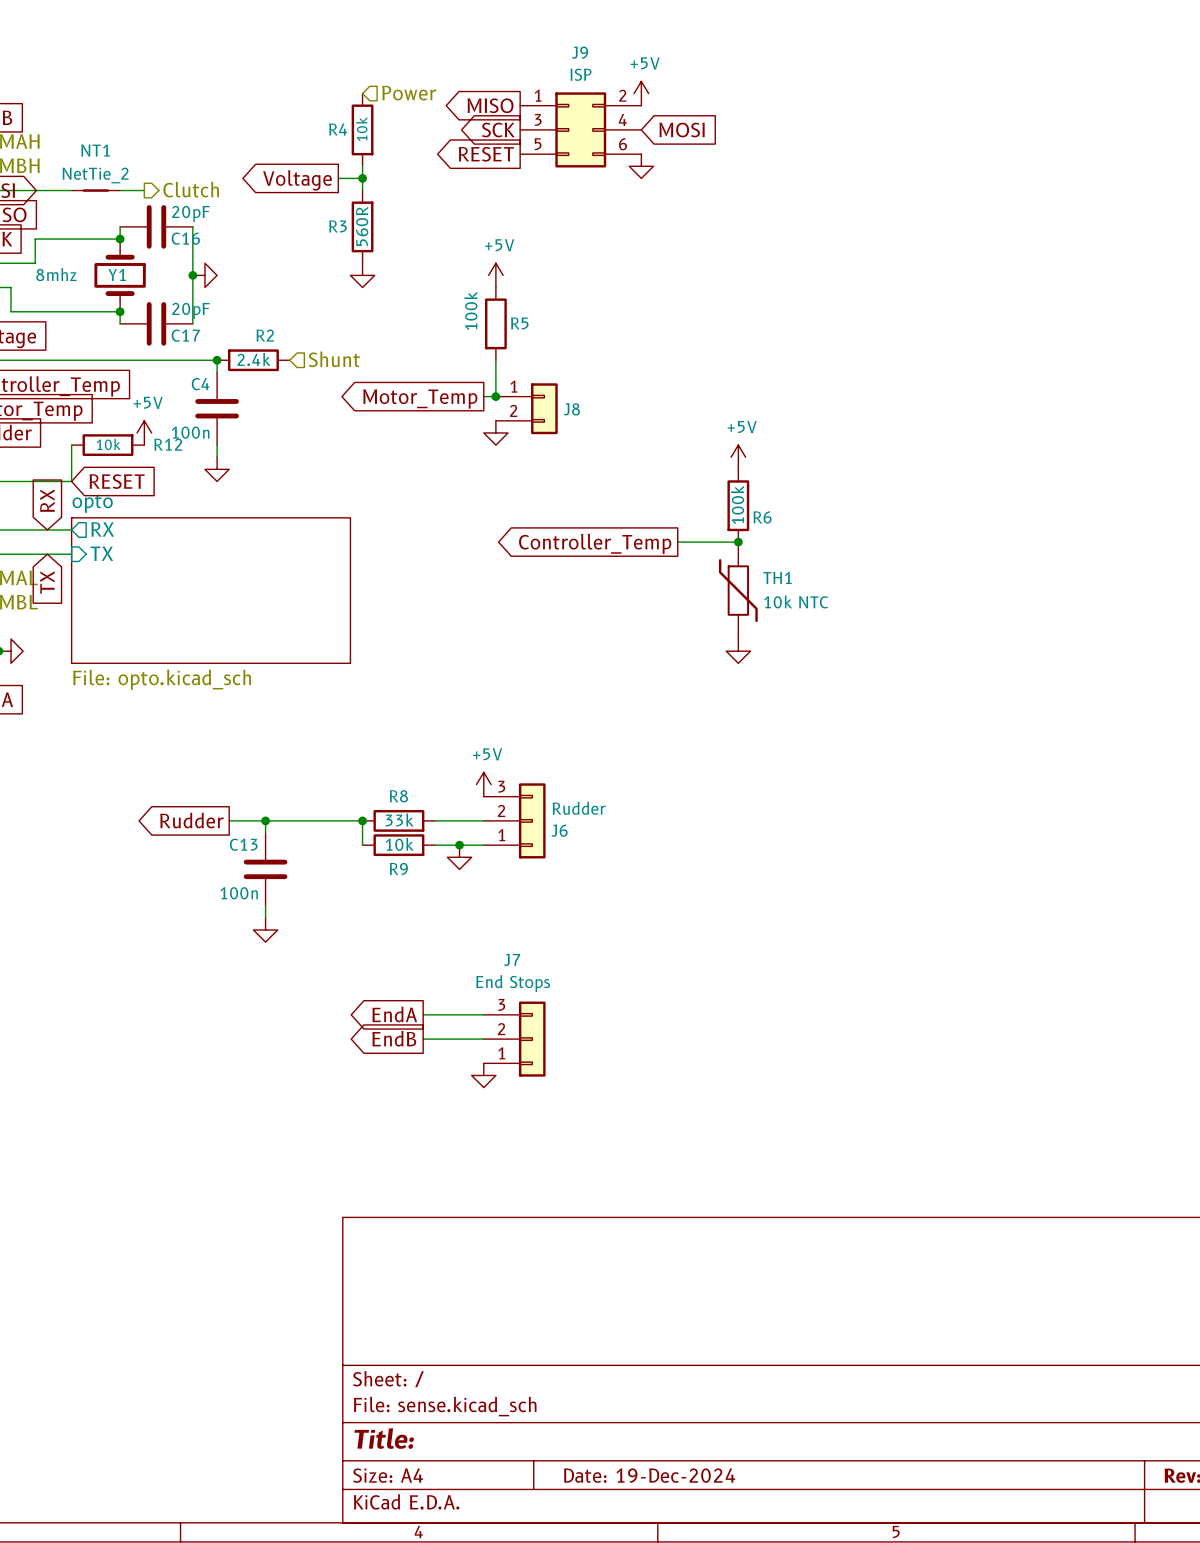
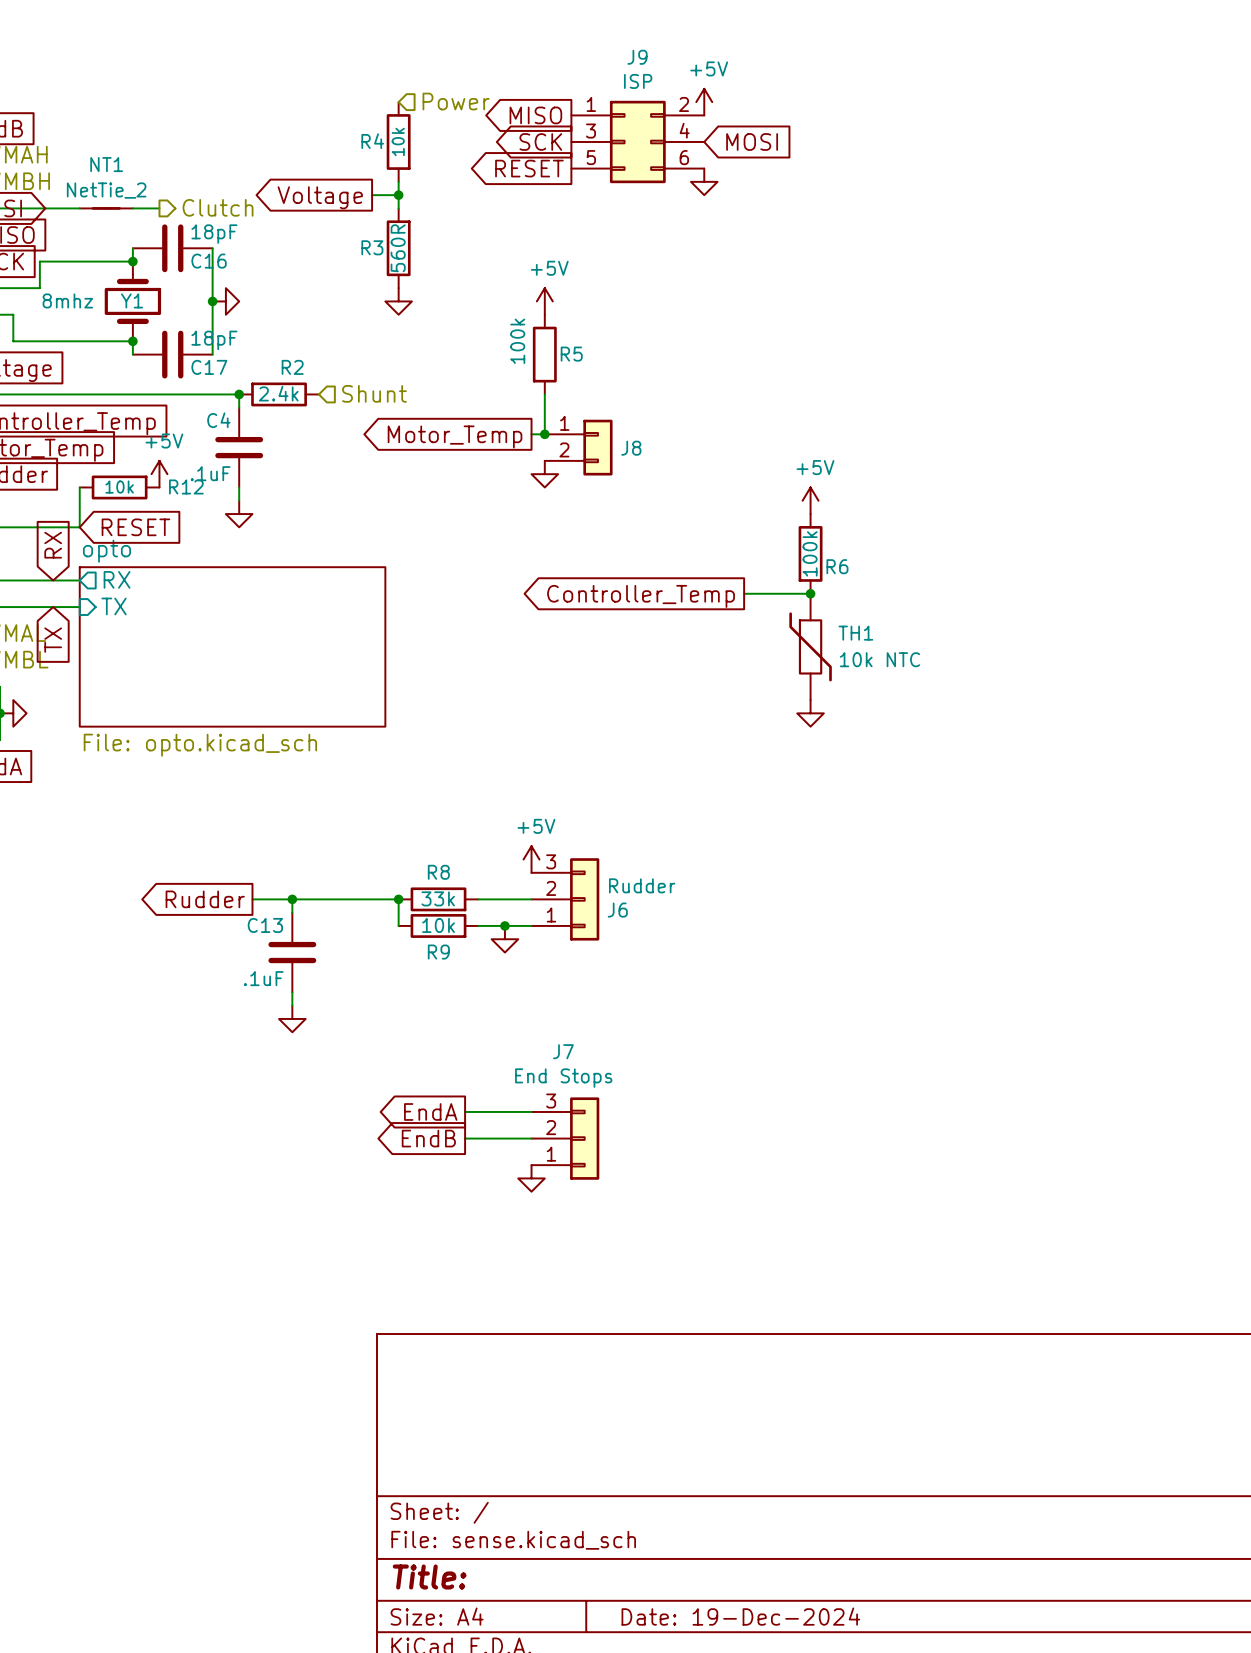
C16 value: 20pF (190, 213) -> 18pF (214, 234)
C17 value: 20pF (190, 310) -> 18pF (214, 340)
C4 value: 100n (190, 432) -> .1uF (210, 473)
C13 value: 100n (239, 893) -> .1uF (263, 978)

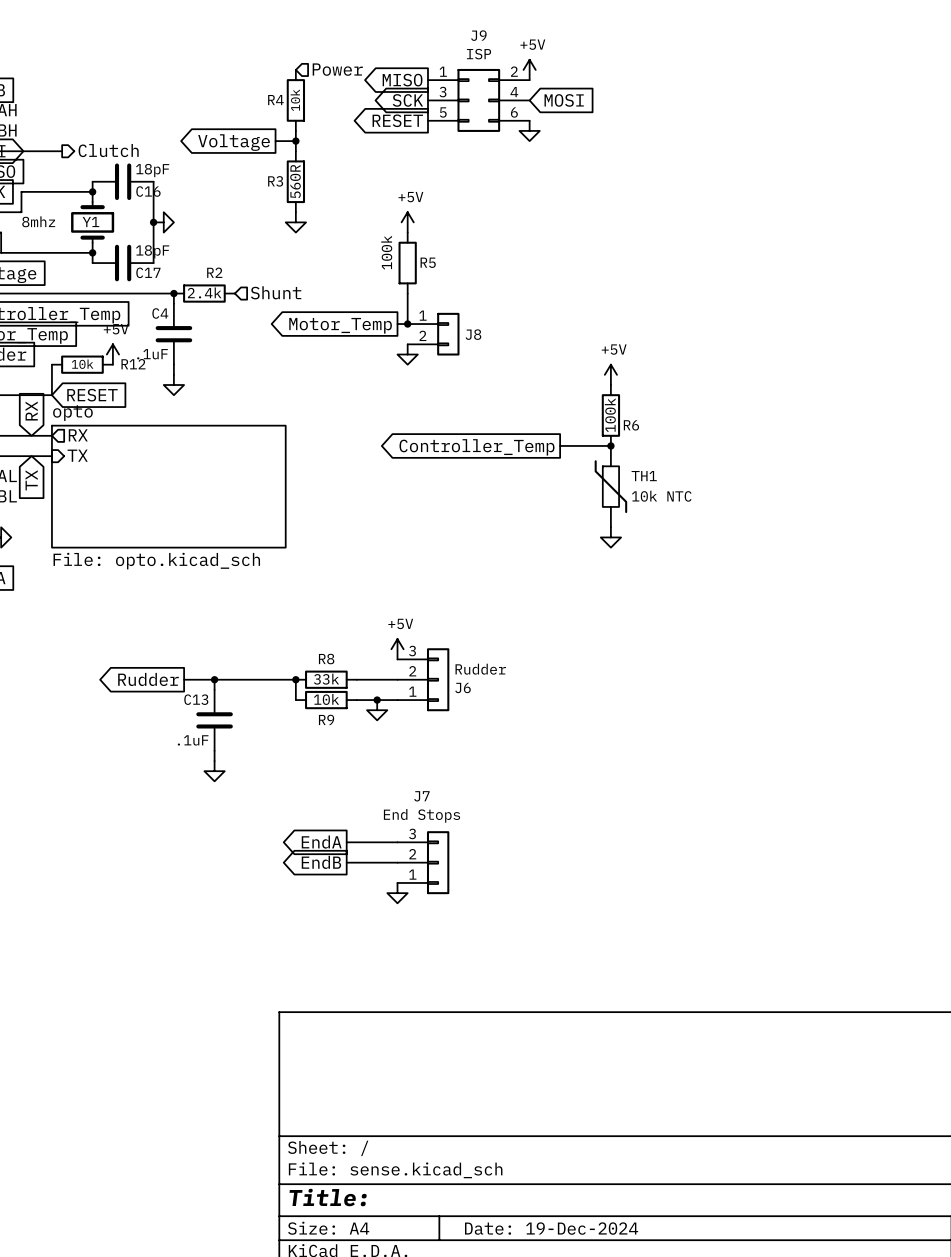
hierarchical label position: Clutch (218, 207) -> Clutch (108, 150)
NT1: NetTie_2 (106, 208) -> none
wire: (132, 208) (159, 208) -> none

